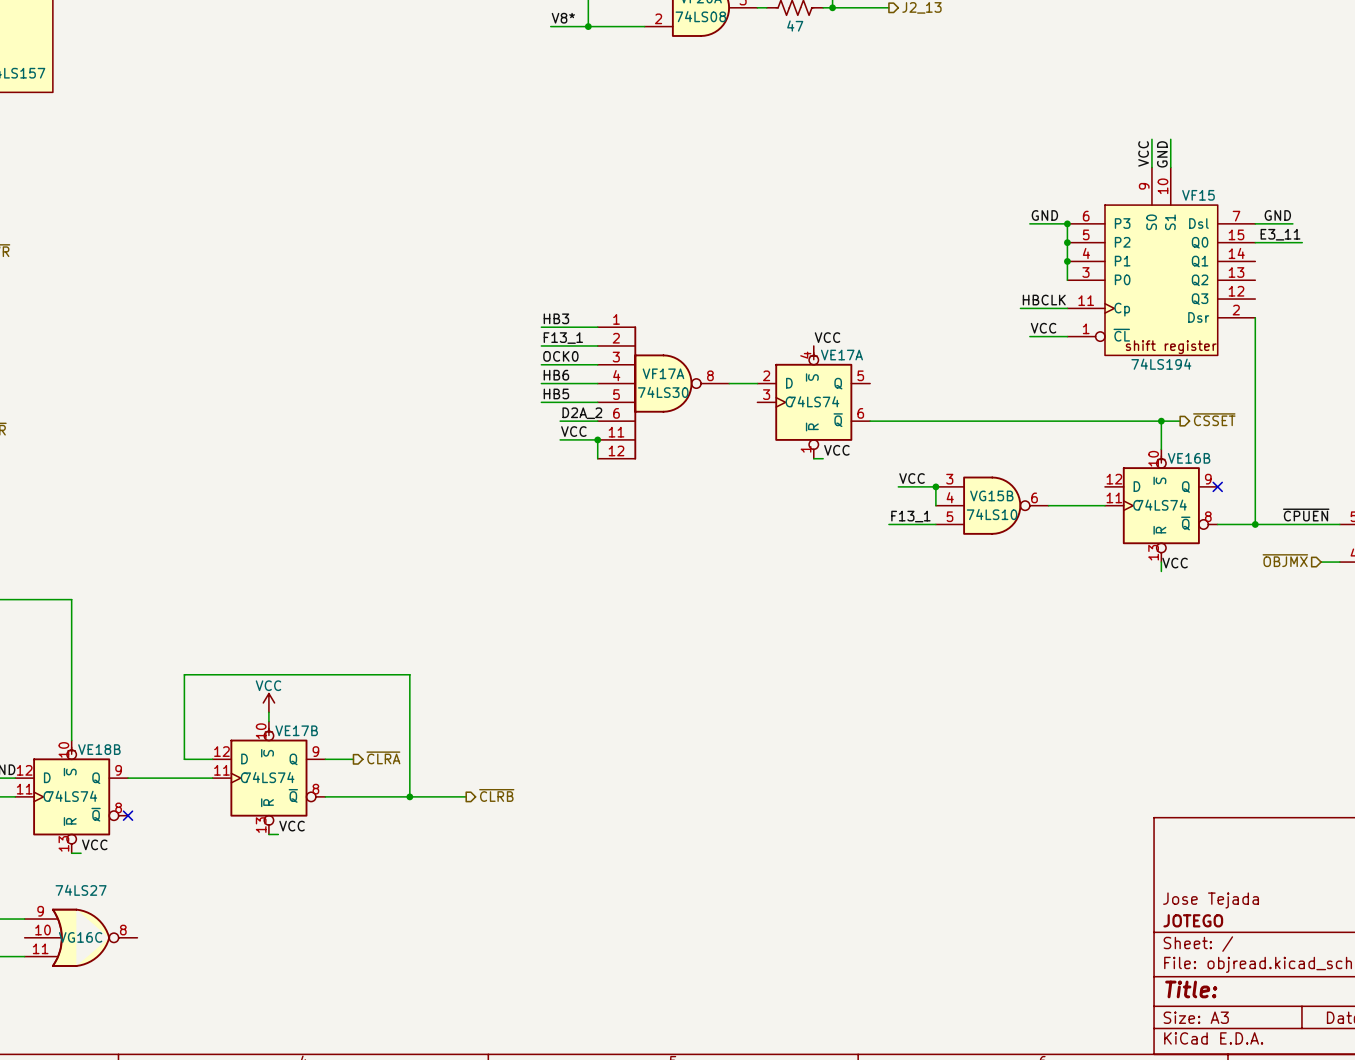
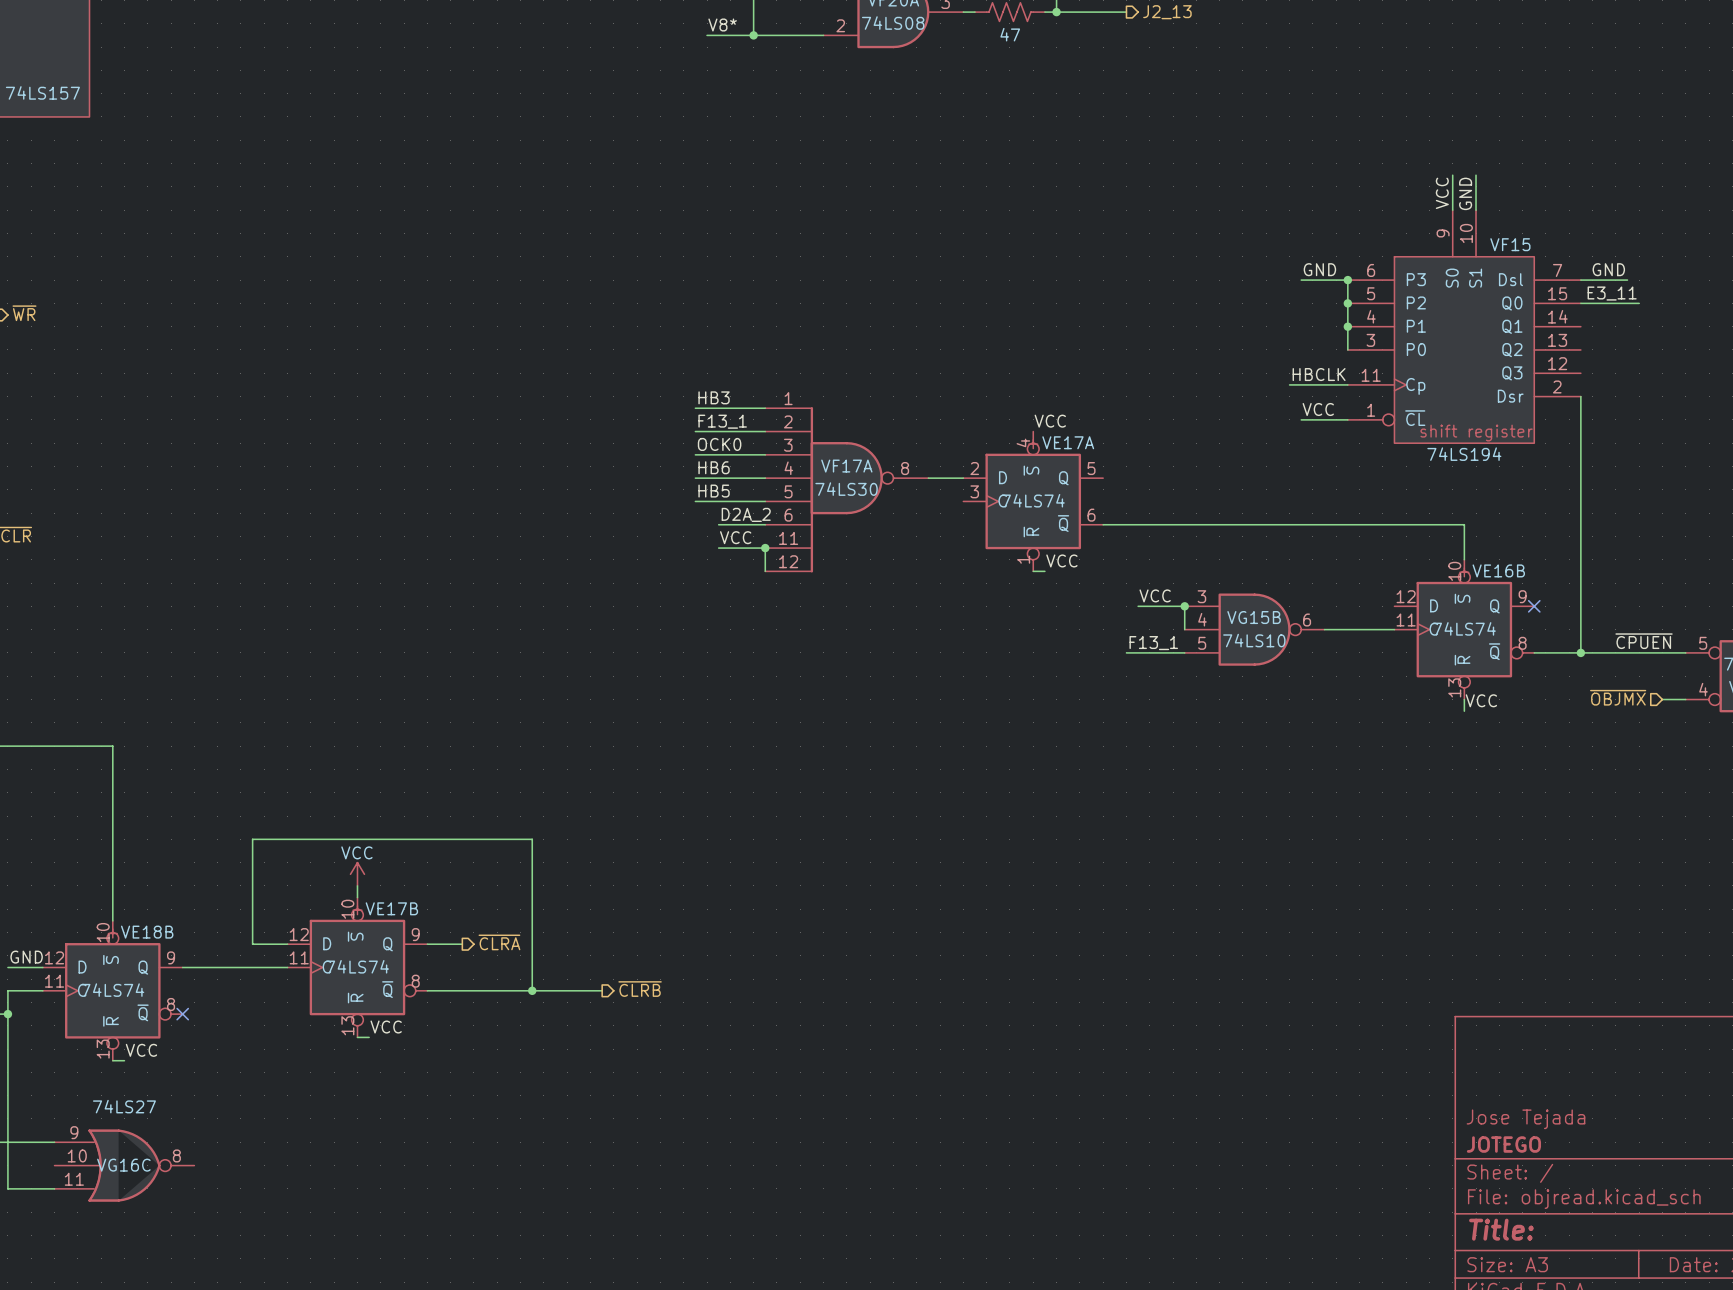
hierarchical label: ~{CSSET} (1214, 419) -> none
wire: (1161, 421) (1180, 421) -> none
junction: (1161, 421) -> none

